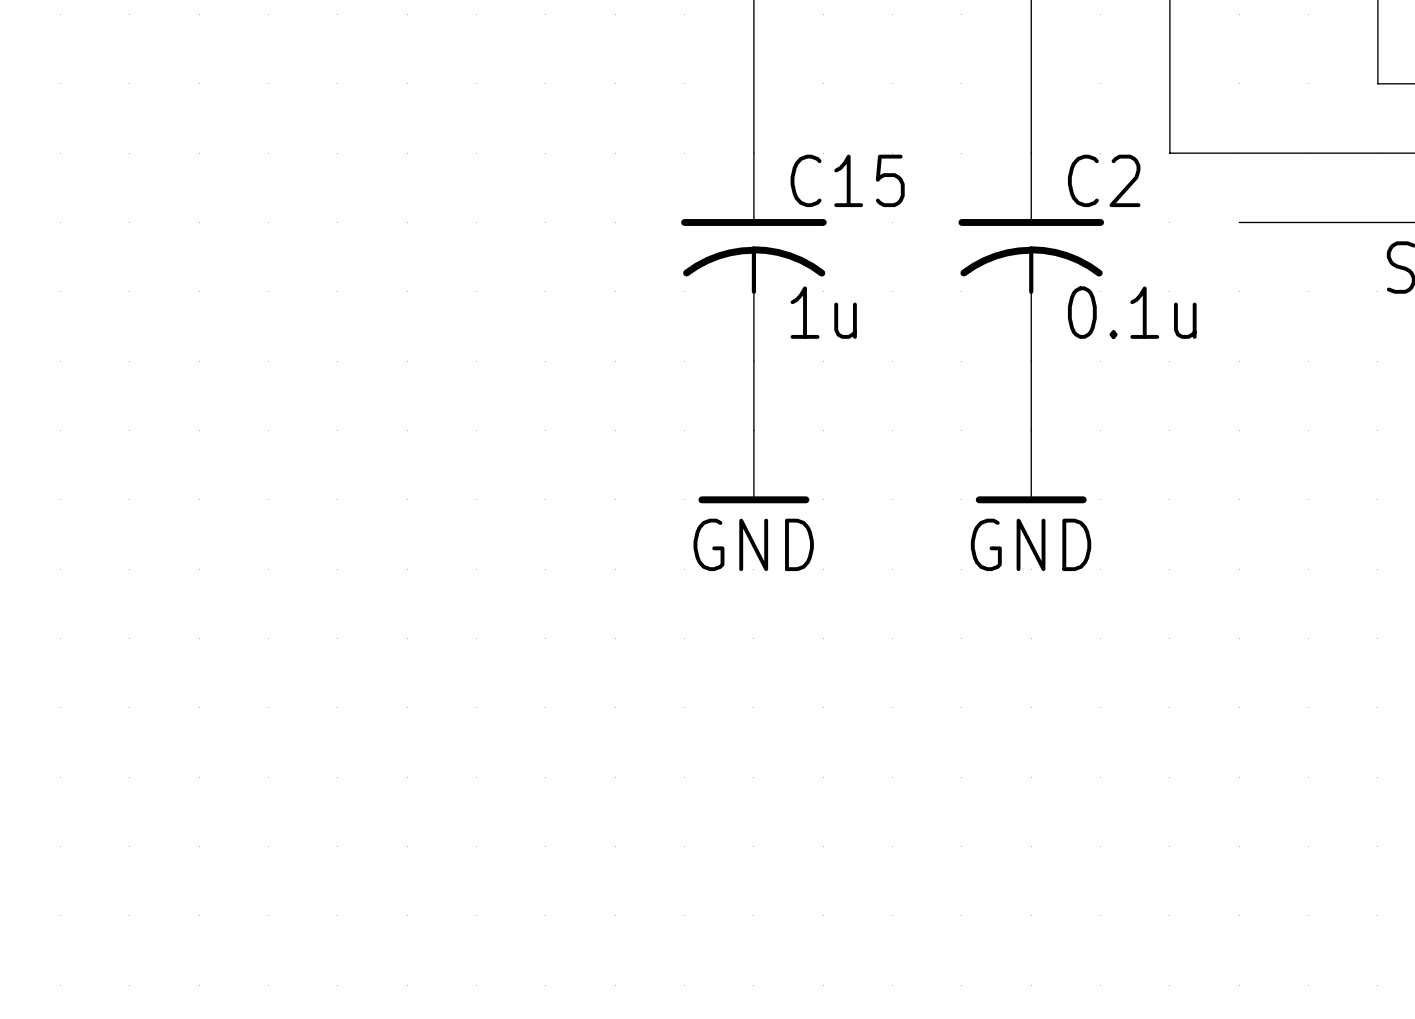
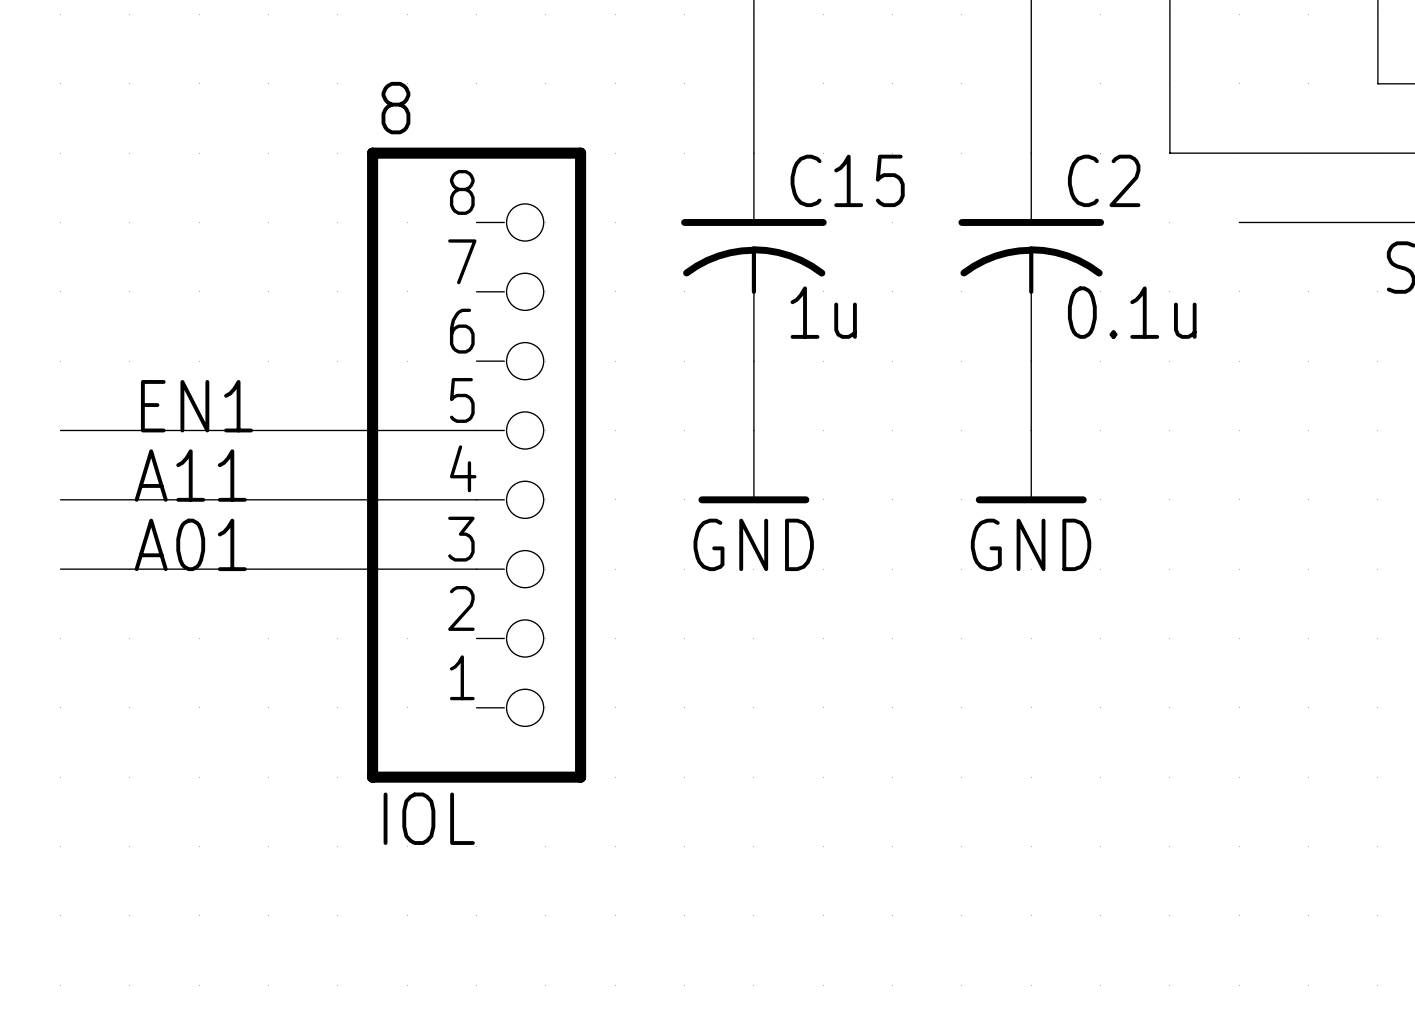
label: none -> EN1 (196, 406)
wire: none -> (60, 430) (476, 430)
IOL: none -> 8 (476, 465)
label: none -> A11 (190, 475)
wire: none -> (60, 499) (476, 499)
label: none -> A01 (190, 544)
wire: none -> (60, 569) (476, 569)

